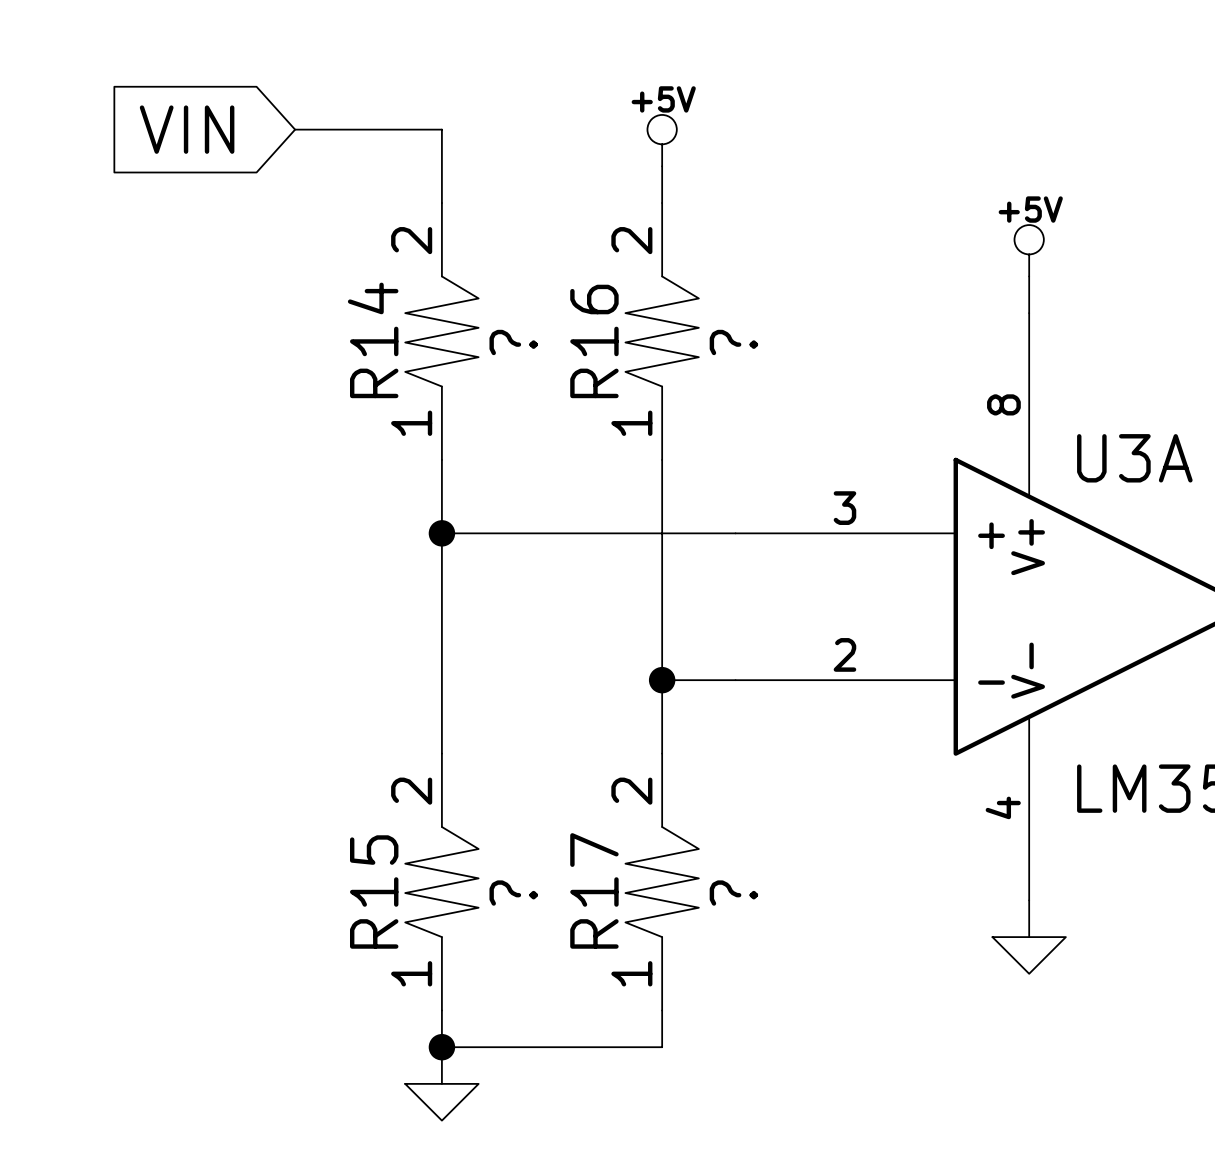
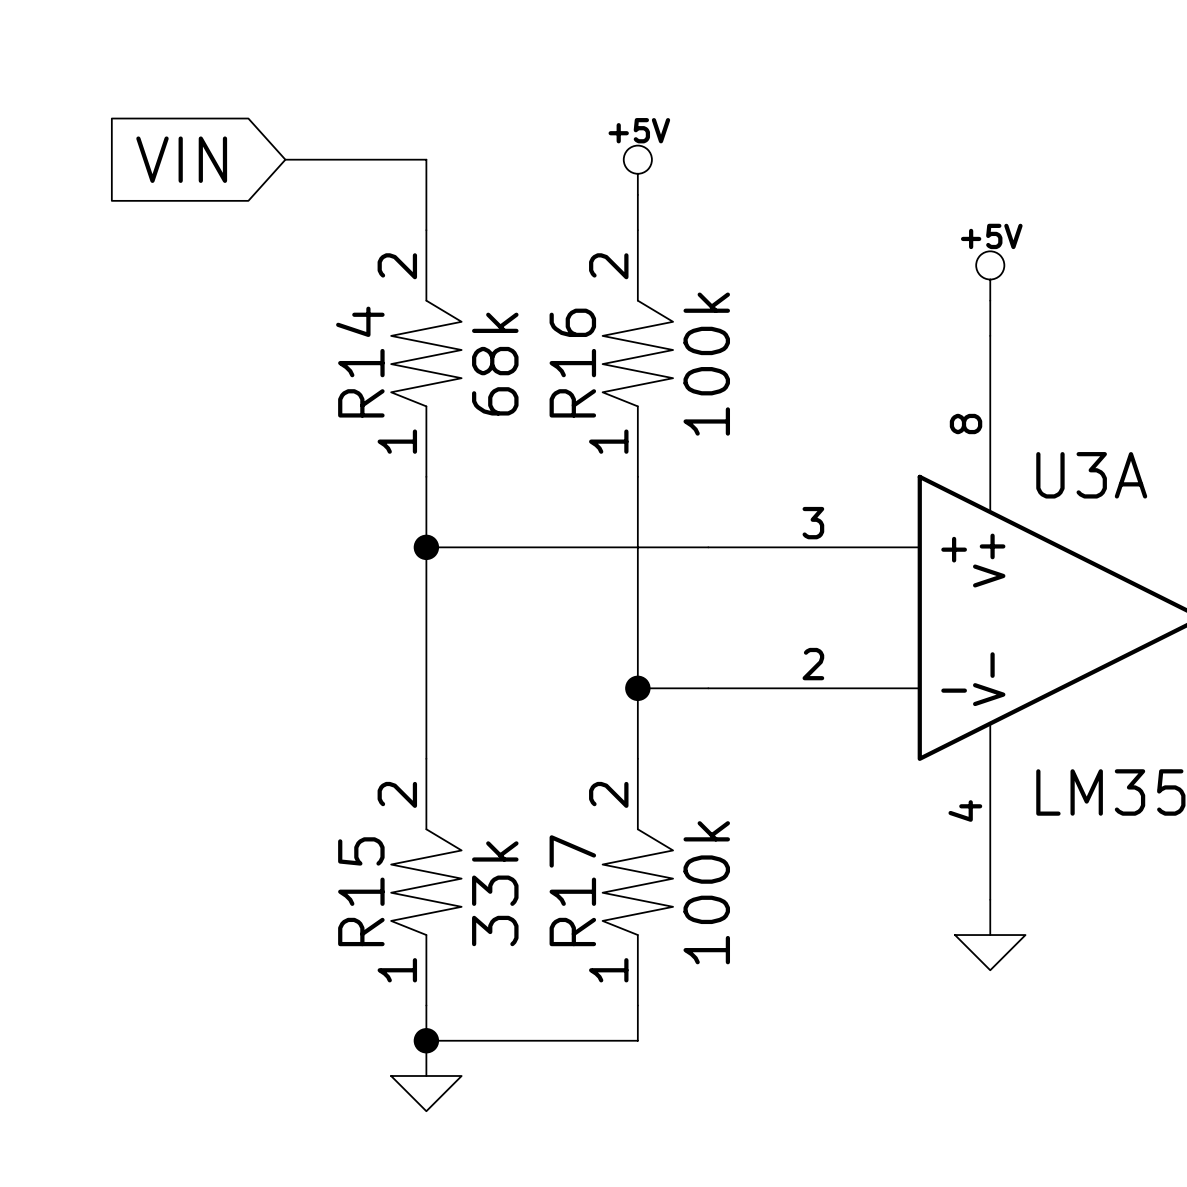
R14 value: ? (513, 342) -> 68k (495, 364)
R16 value: ? (733, 342) -> 100k (706, 364)
R15 value: ? (513, 893) -> 33k (495, 893)
R17 value: ? (733, 893) -> 100k (706, 892)

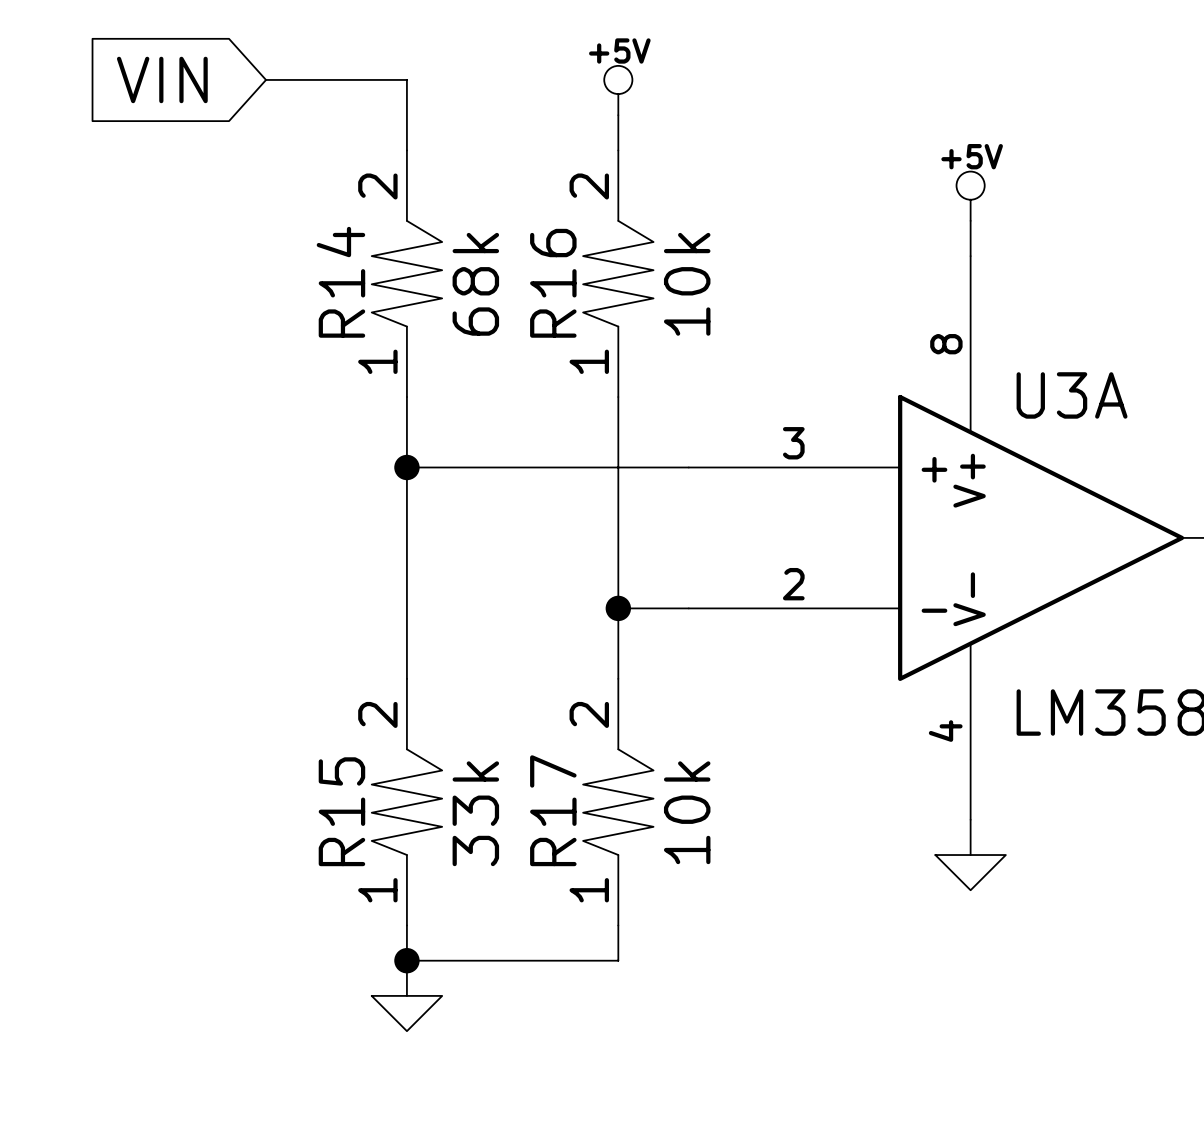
R16 value: 100k (706, 364) -> 10k (687, 284)
R17 value: 100k (706, 892) -> 10k (687, 812)

